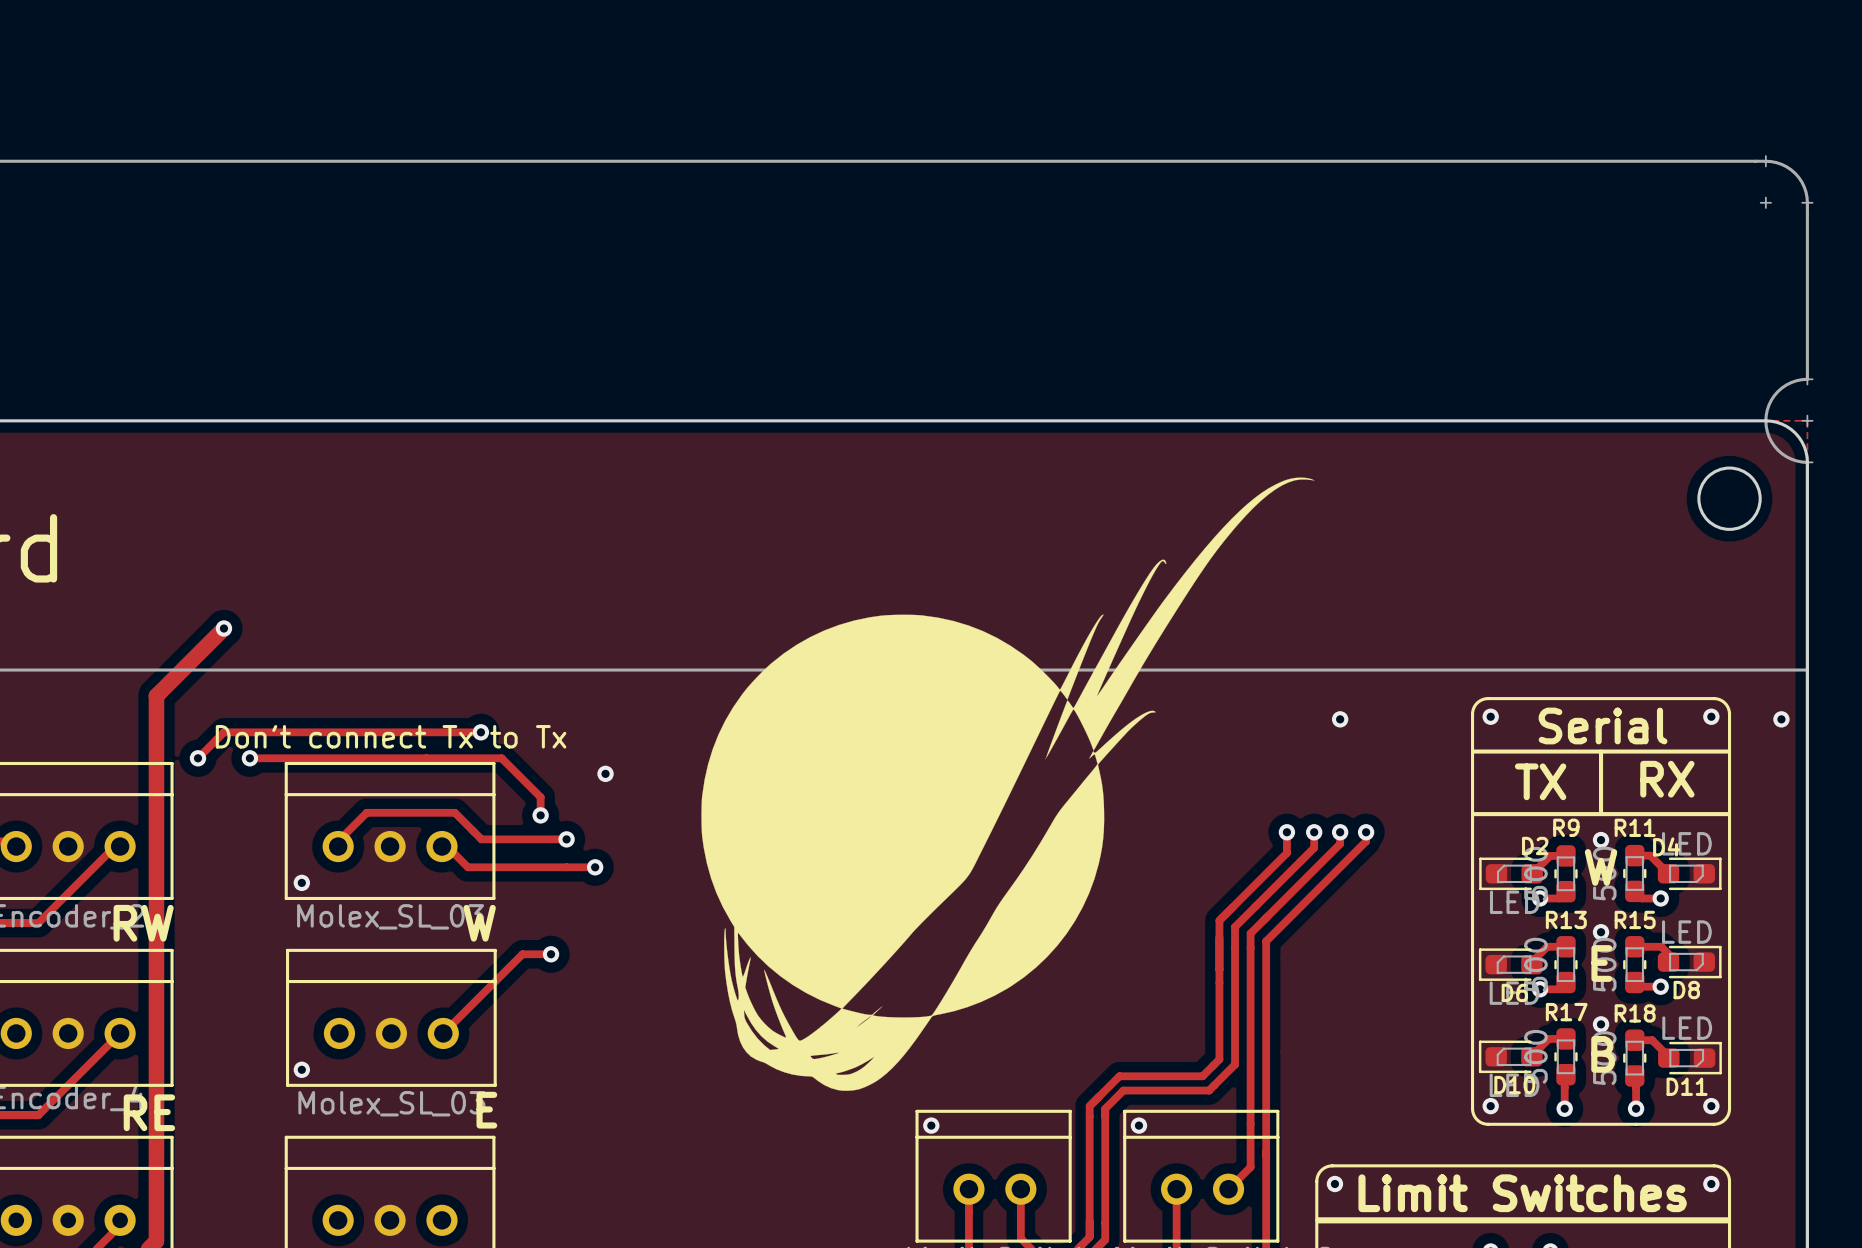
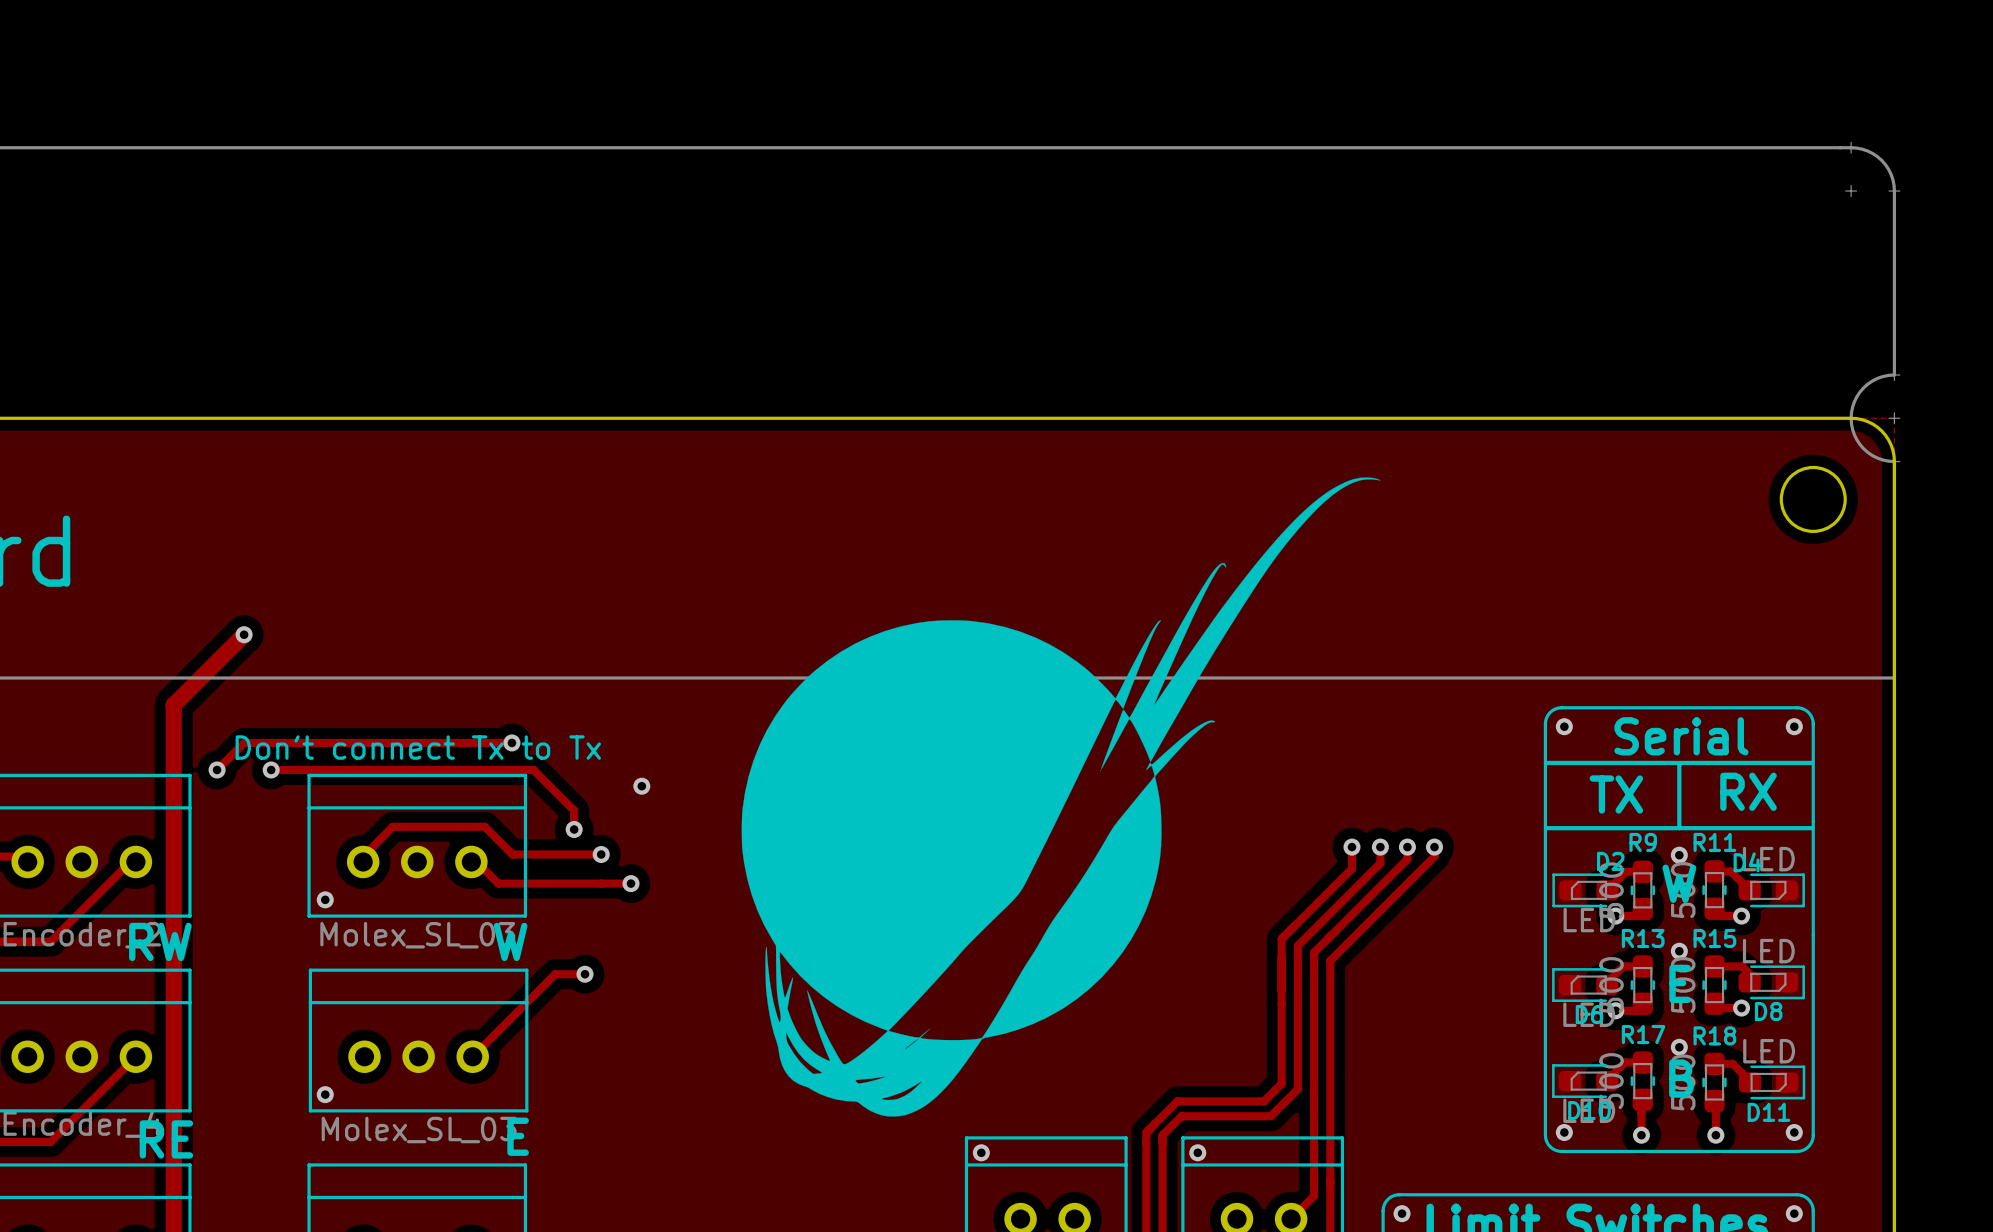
via: (1340, 719) -> none
via: (1781, 719) -> none

